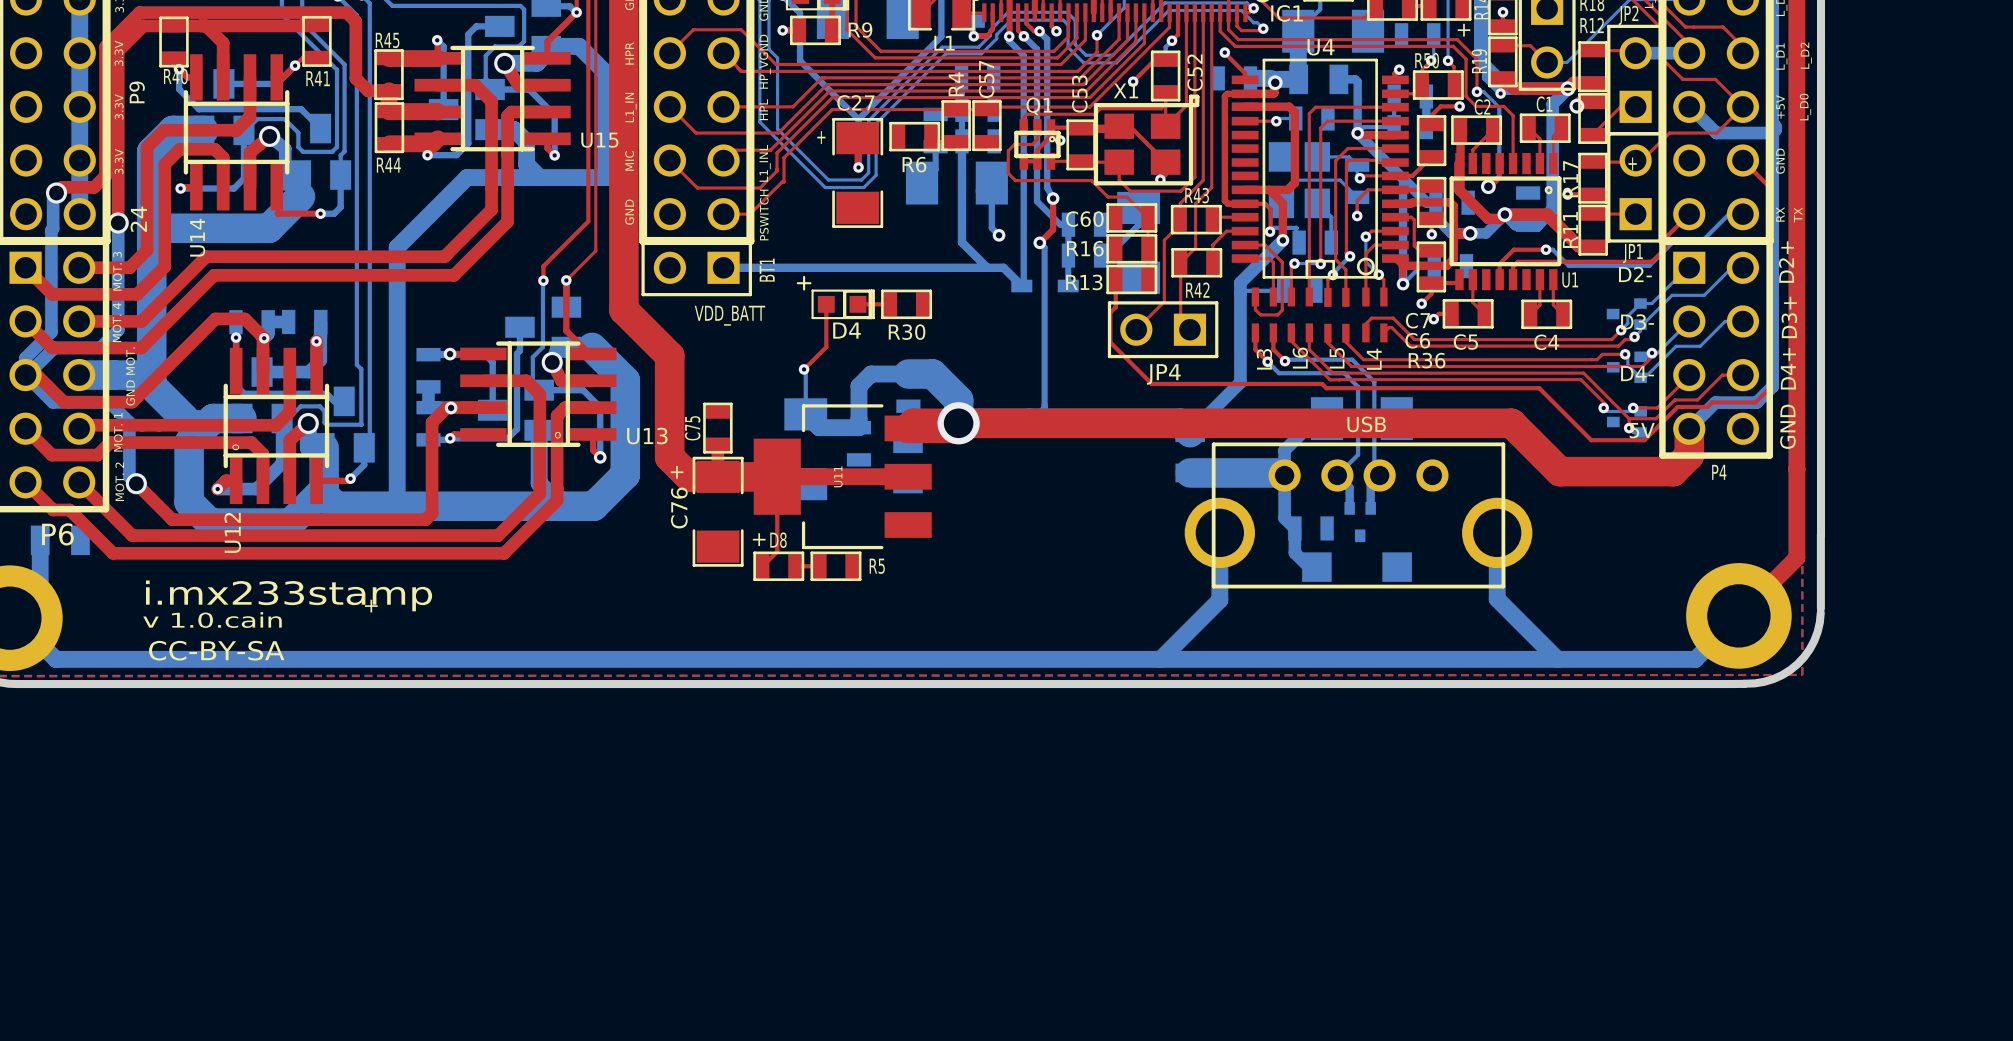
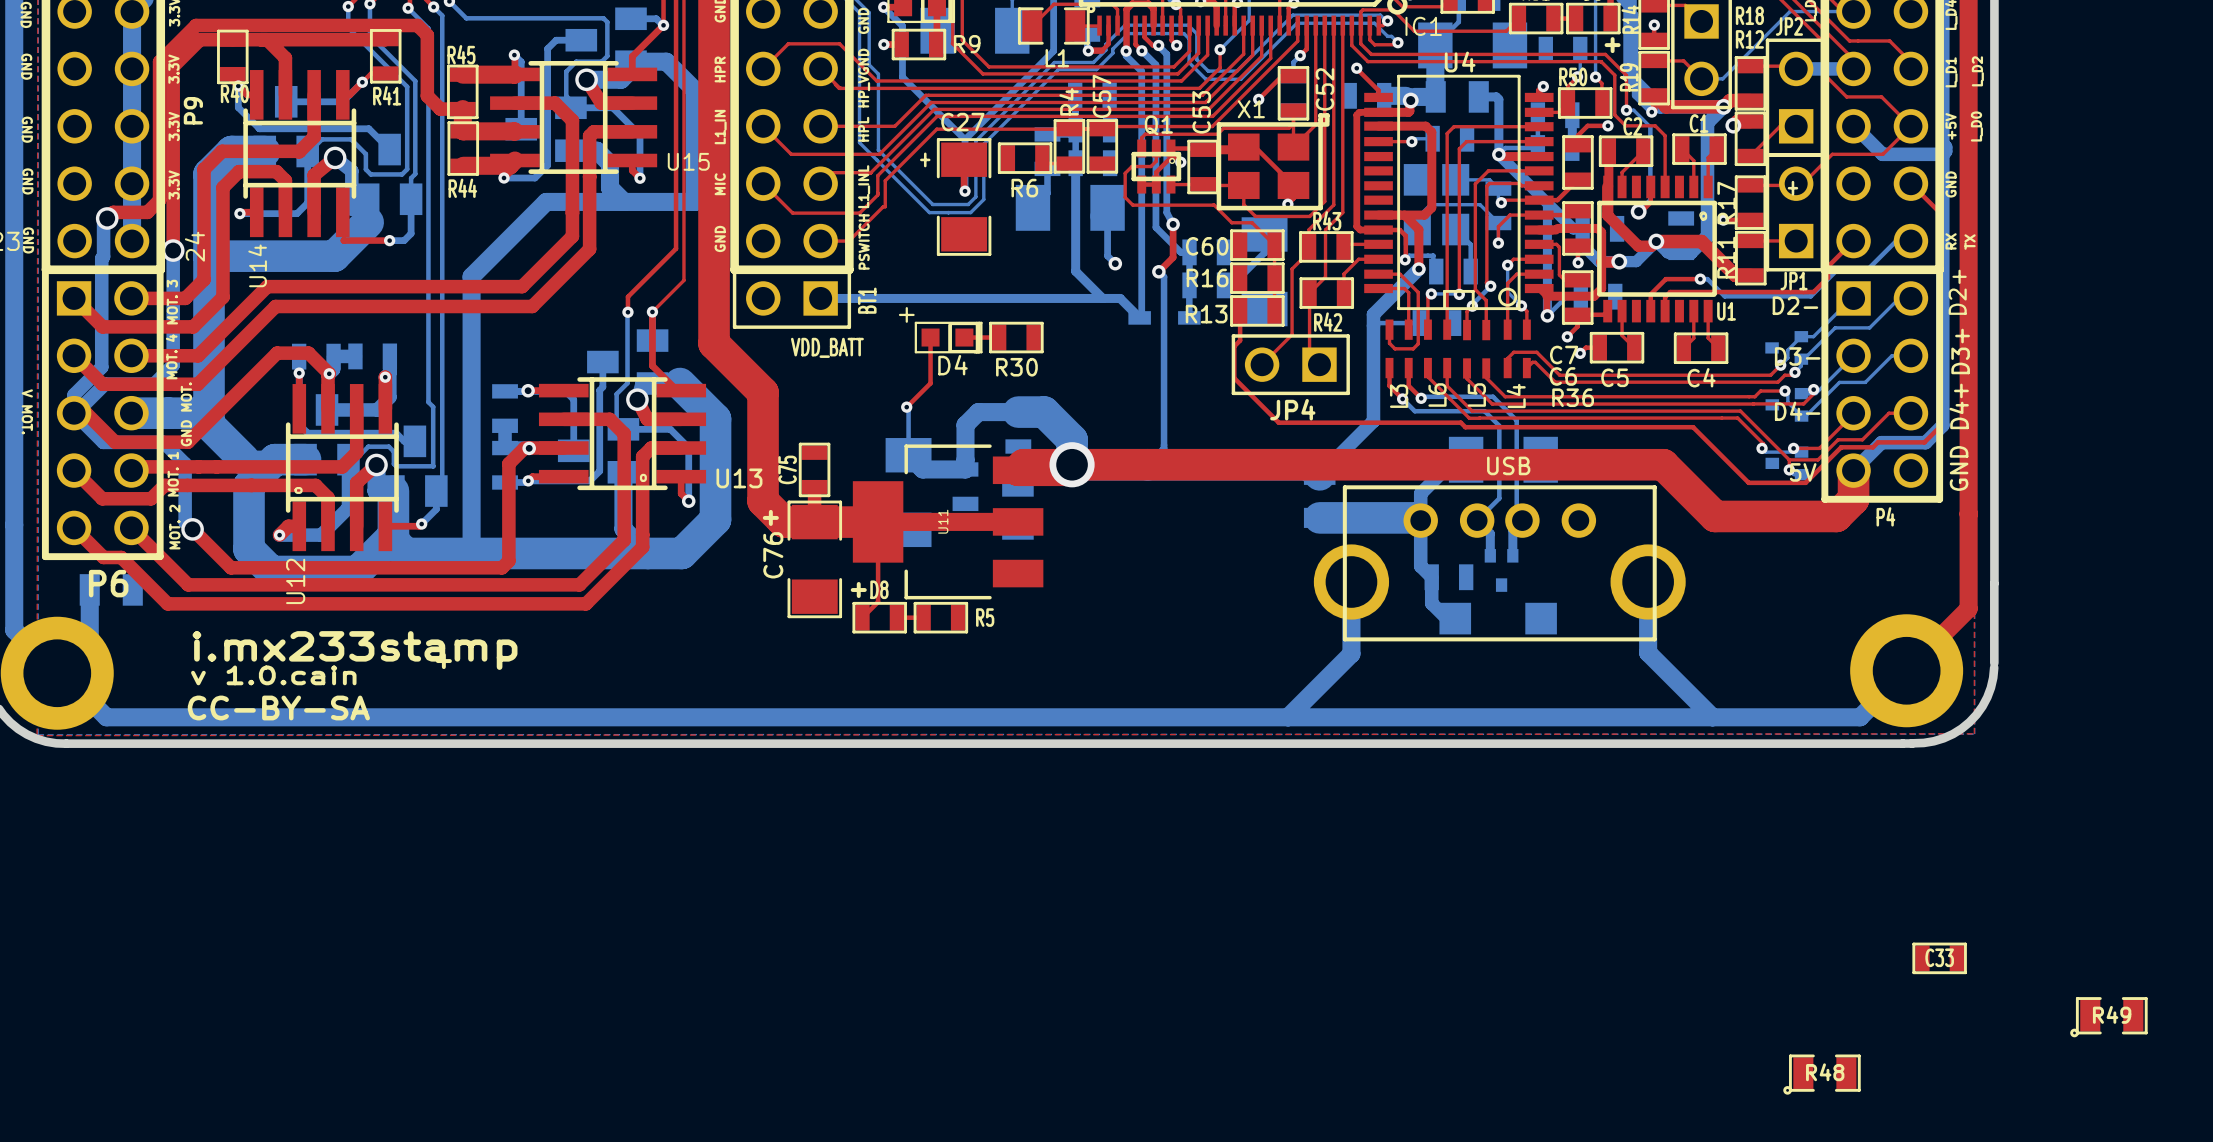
C33: none -> (1939, 958)
R49: none -> (2108, 1017)
R48: none -> (1822, 1074)

